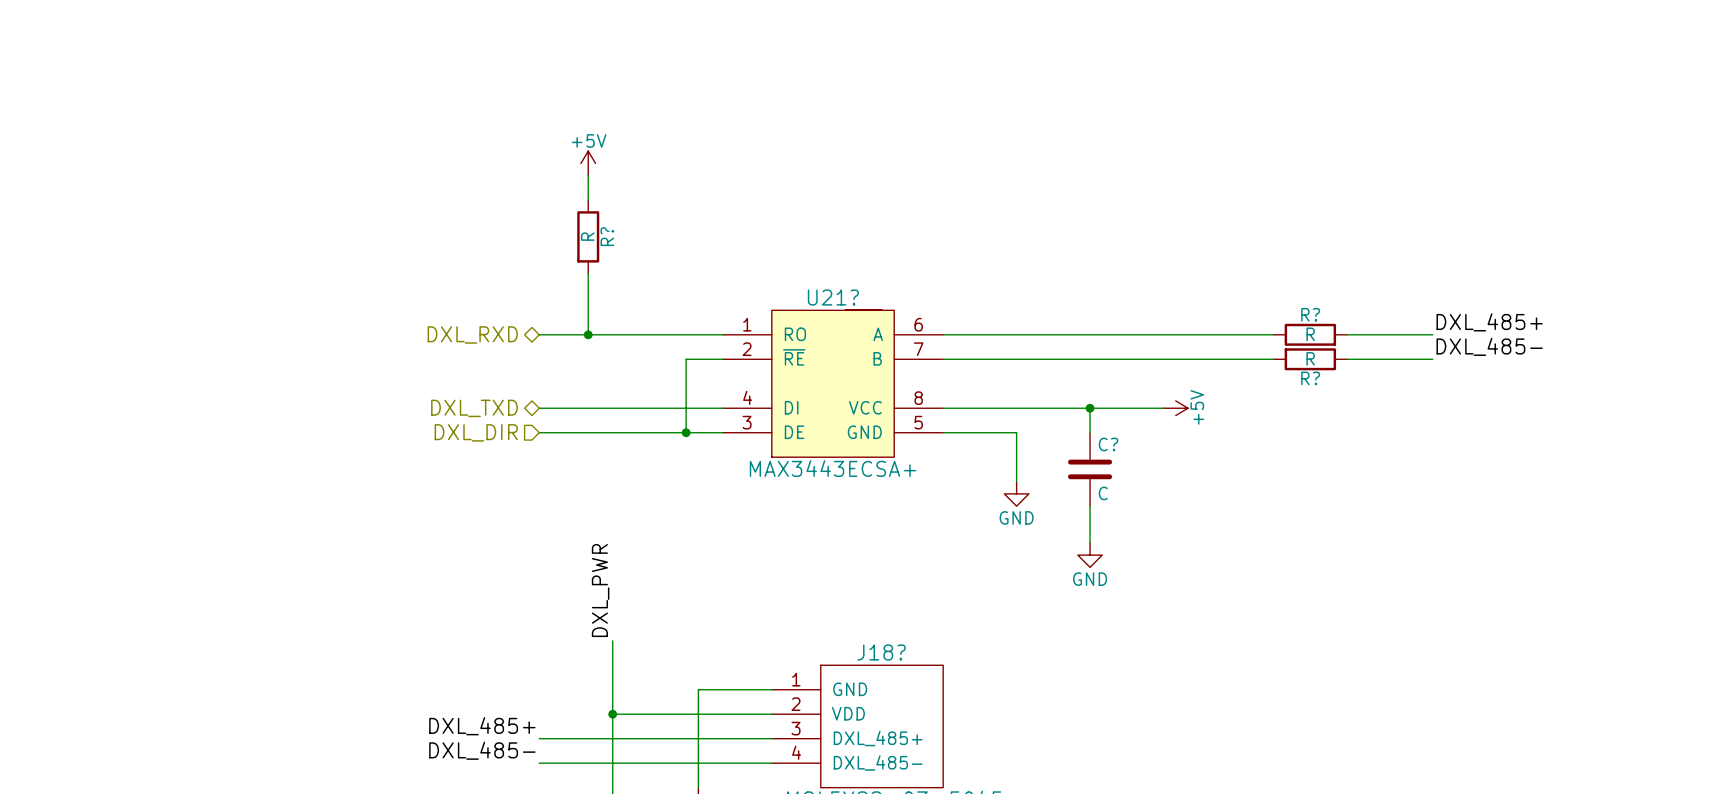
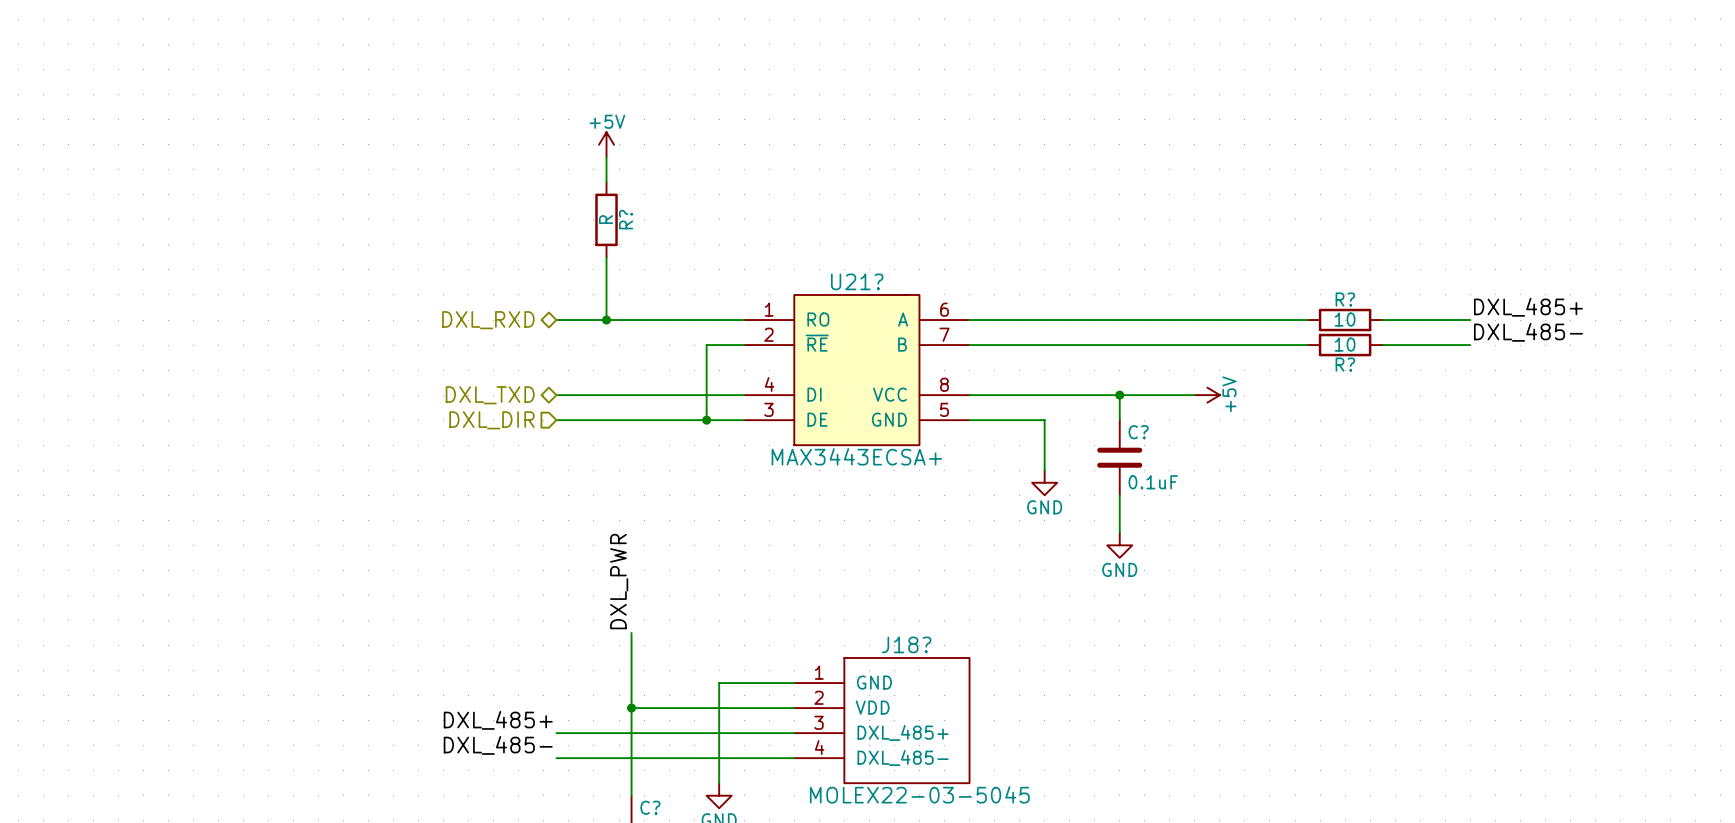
R? value: R (1310, 334) -> 10 (1345, 319)
R? value: R (1310, 358) -> 10 (1345, 344)
C? value: C (1103, 493) -> 0.1uF (1153, 482)

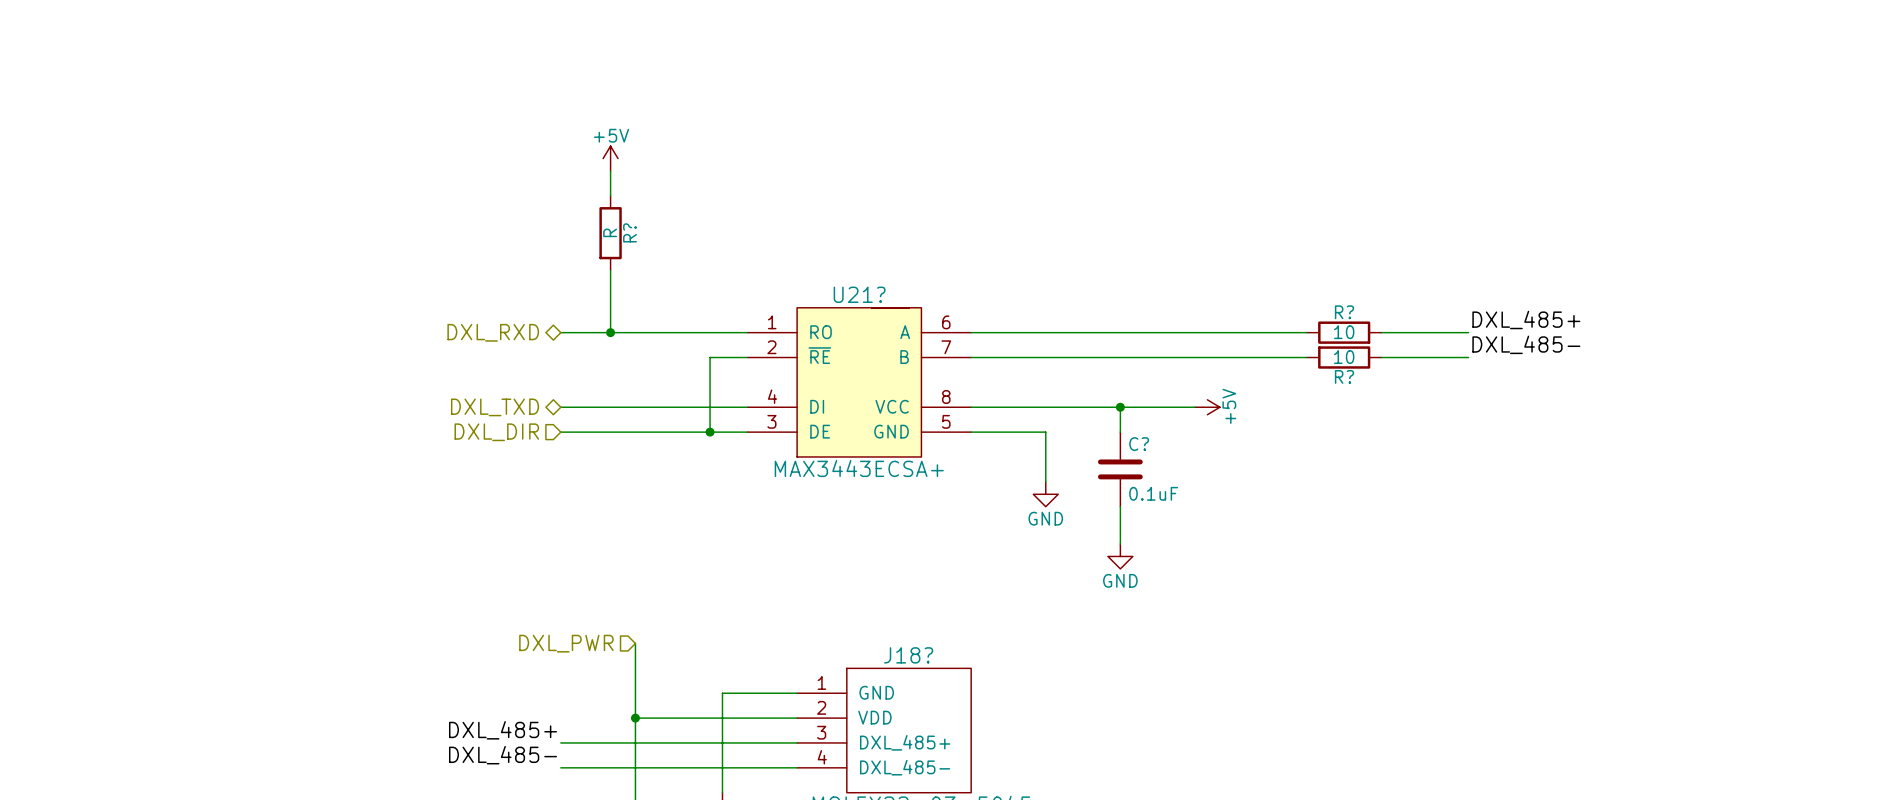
label: DXL_PWR (619, 581) -> none
hierarchical label: none -> DXL_PWR (566, 643)

